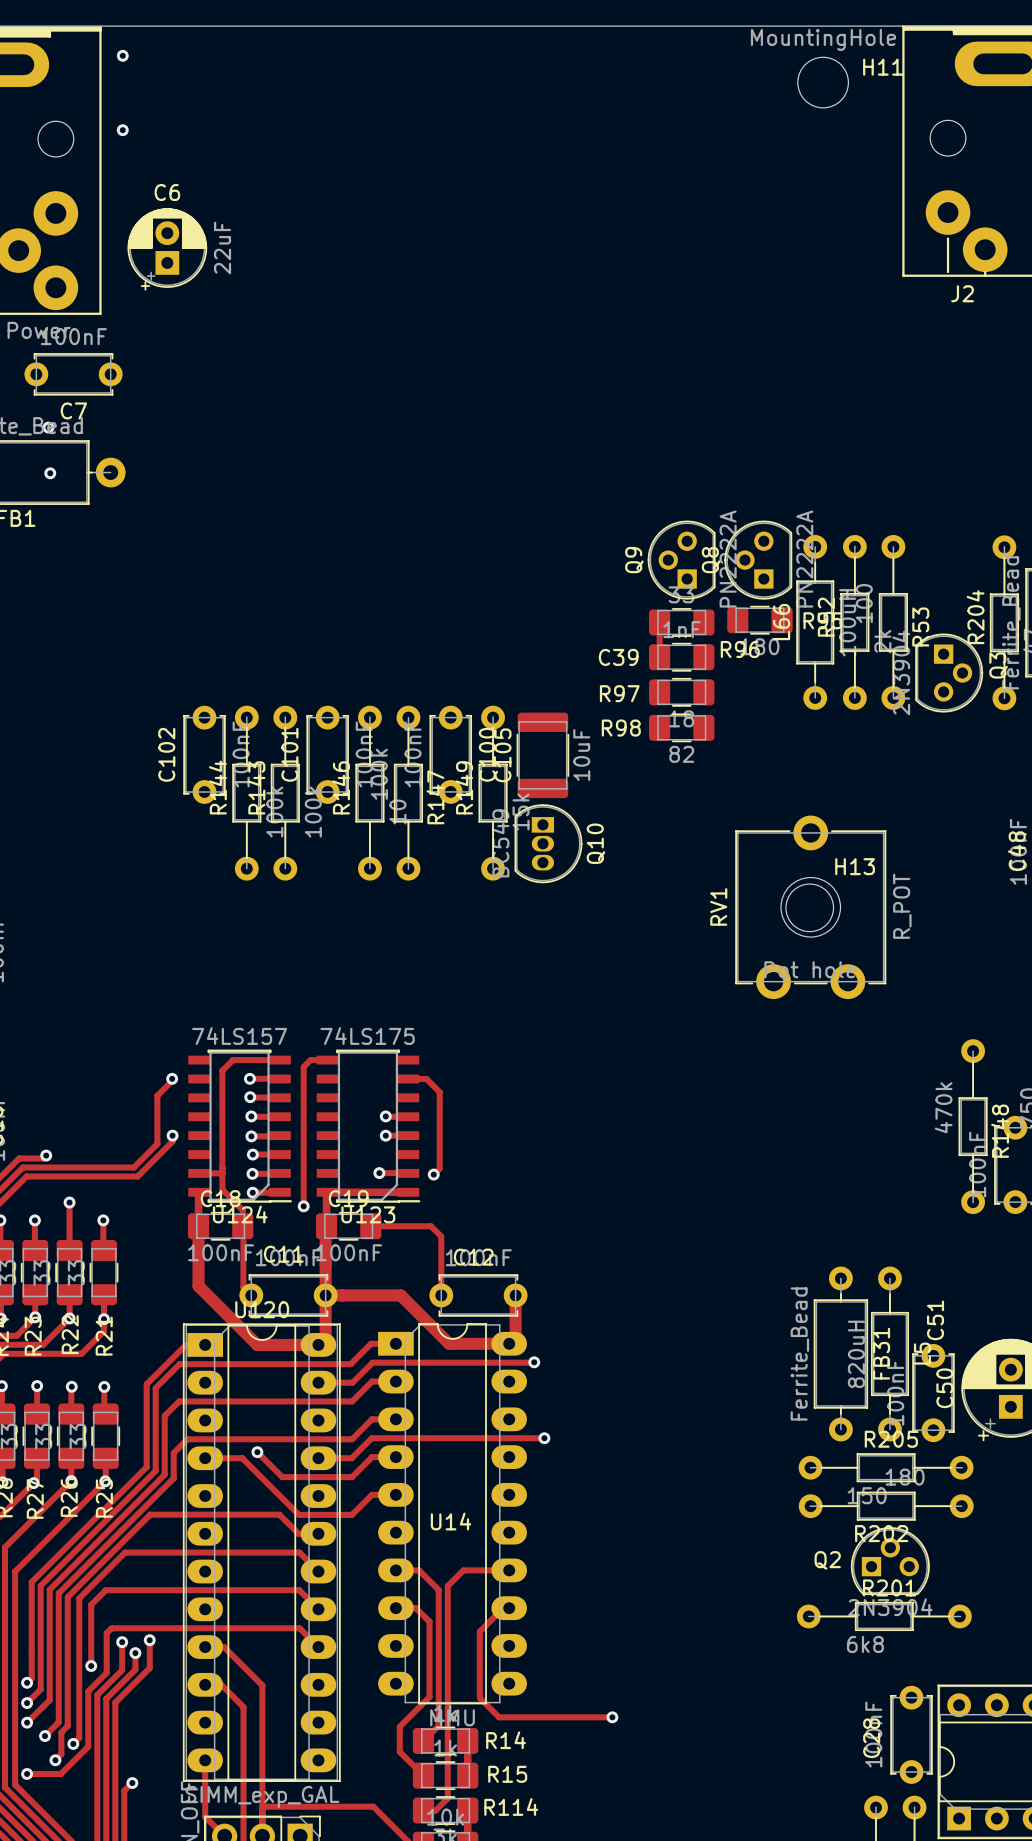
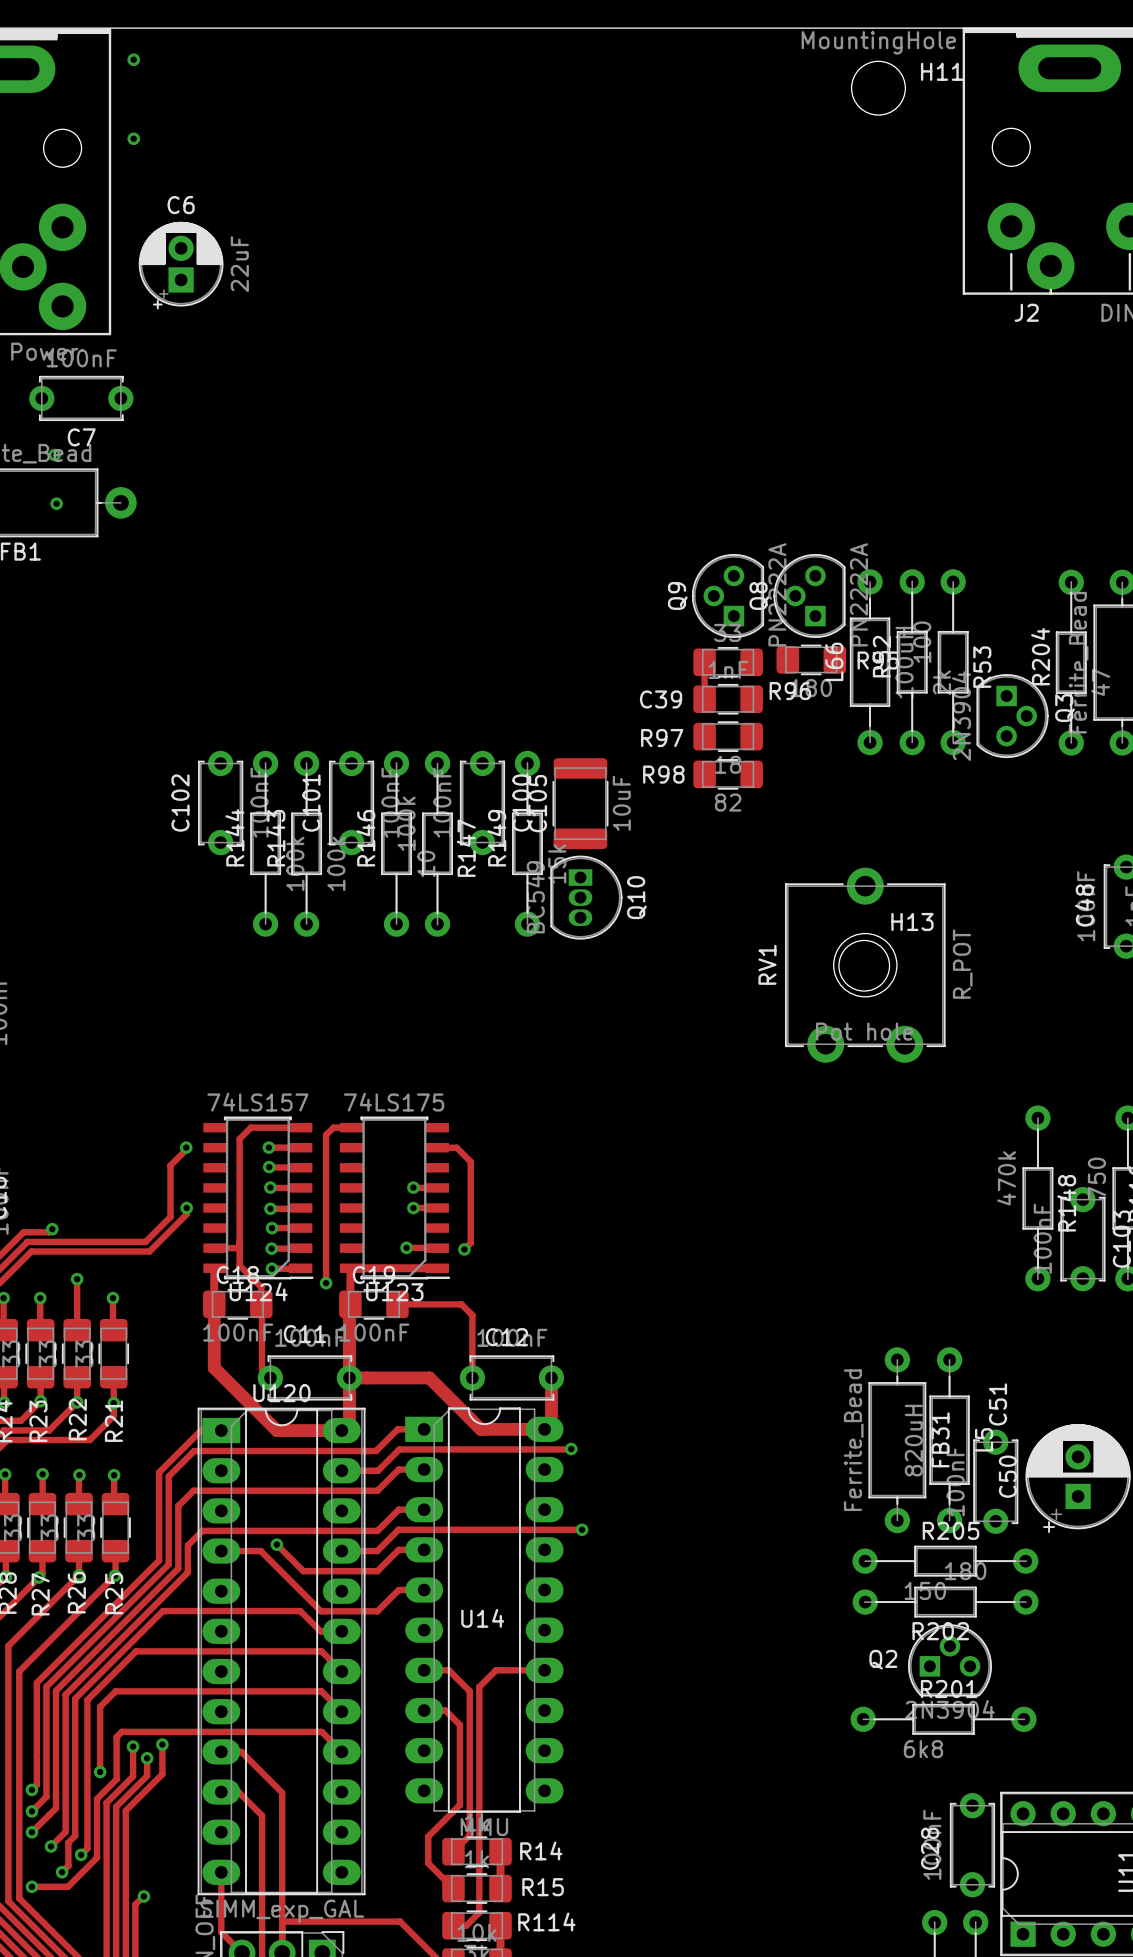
track: (509, 1608) (503, 1608) (479, 1631) (479, 1698) (499, 1717) (612, 1717) -> none
via: (612, 1717) -> none

